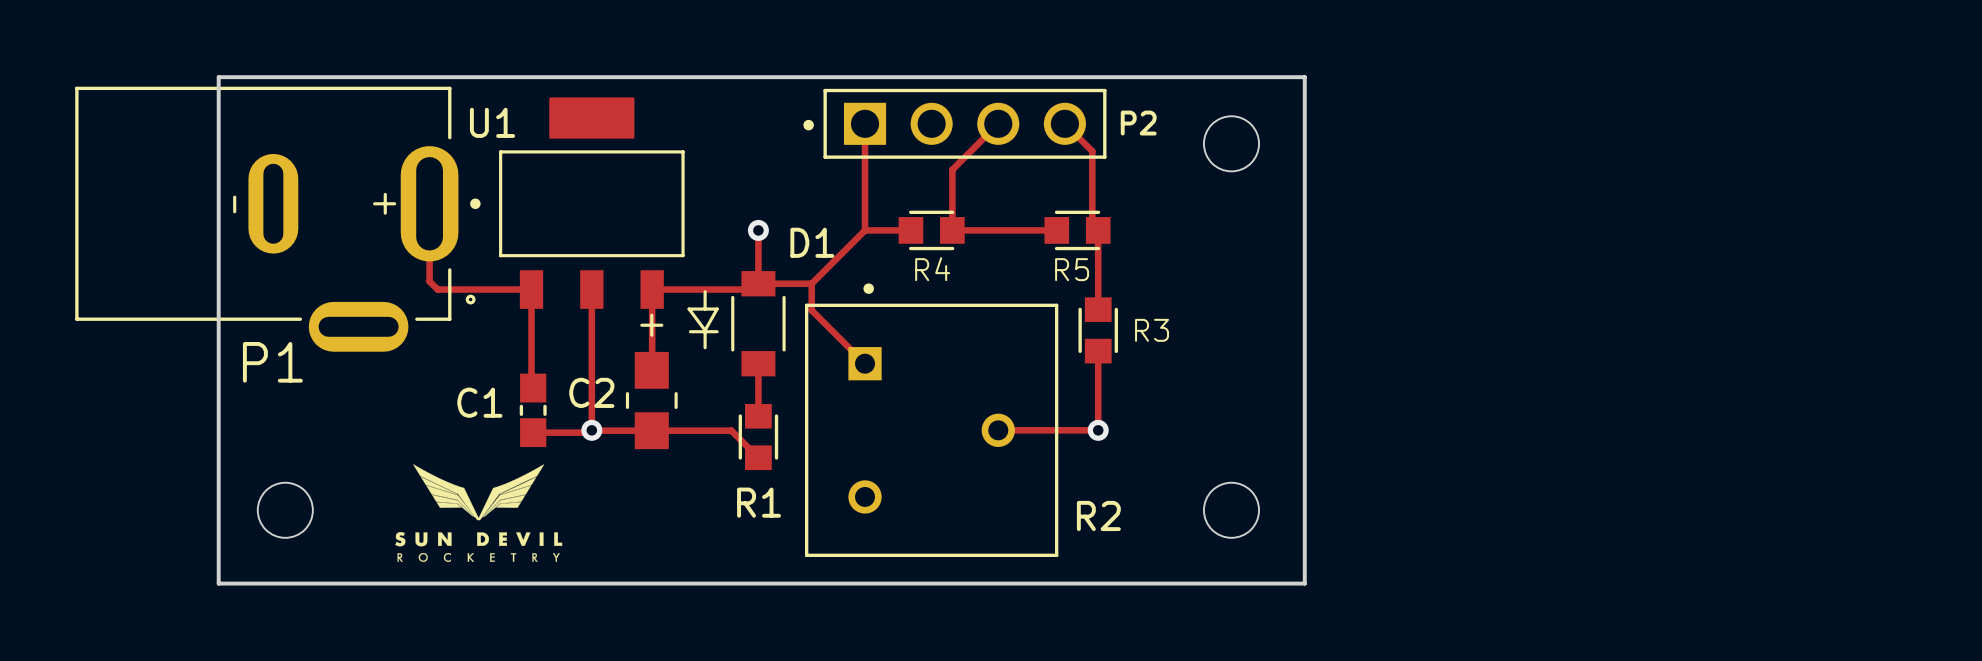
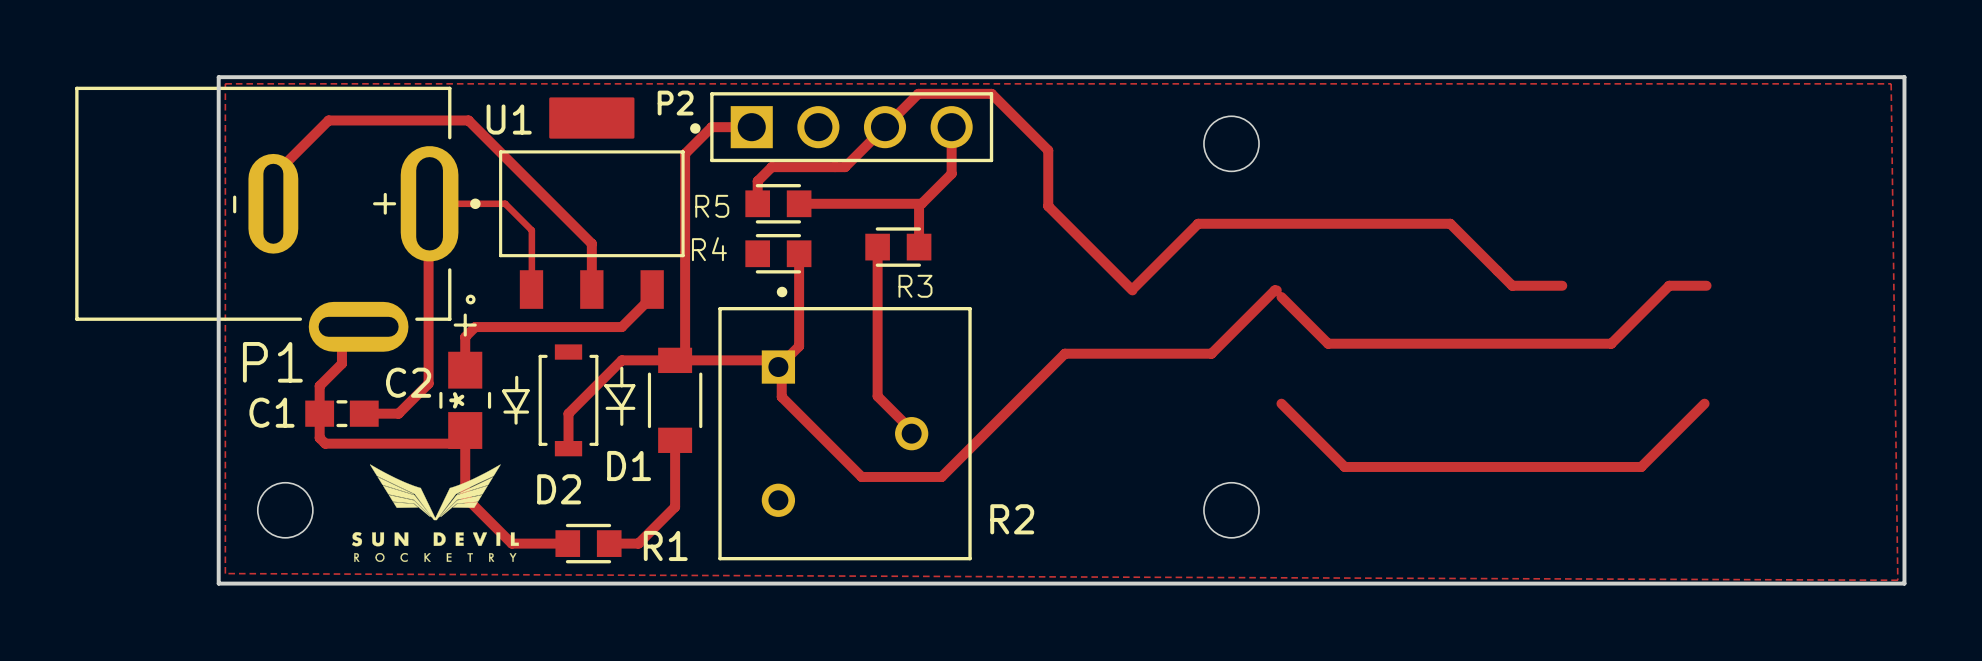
board edge: (1304, 77) (1304, 583) -> (1304, 77) (1904, 77) (1904, 583) (1304, 583)
zone outline: none -> (225, 83) (225, 573) (1897, 580) (1891, 83) (225, 83)
U1 name position: U1 (492, 122) -> U1 (509, 119)
track: (865, 123) (865, 230) -> none
P2 position: (954, 123) -> (841, 127)
track: (998, 123) (952, 169) (952, 230) (1056, 230) -> none
track: (1064, 123) (1092, 151) (1092, 230) -> none
P2 name position: P2 (1138, 123) -> P2 (675, 103)
track: none -> (755, 127) (711, 127) (685, 153) (685, 357)
track: none -> (951, 127) (951, 173) (921, 203) (799, 203)
track: none -> (445, 203) (505, 203) (531, 230) (531, 290)
track: none -> (757, 203) (757, 181) (771, 167) (845, 167) (918, 93) (991, 93) (1048, 150) (1048, 206) (1132, 290)
track: none -> (919, 206) (919, 247)
track: none -> (428, 220) (428, 383) (398, 413) (364, 413)
track: (429, 221) (429, 281) (437, 289) (531, 289) (531, 386) (533, 388) -> none
track: (758, 230) (758, 283) -> none
via: (758, 230) -> none
track: (865, 230) (811, 283) -> none
track: (865, 230) (910, 230) -> none
R4 position: (931, 230) -> (778, 253)
R5 position: (1077, 230) -> (778, 203)
track: (1098, 230) (1098, 309) -> none
D1 name position: D1 (812, 242) -> D1 (629, 465)
track: none -> (877, 247) (877, 396) (911, 430)
track: none -> (799, 253) (799, 346) (781, 363)
R4 name position: R4 (932, 269) -> R4 (709, 249)
R5 name position: R5 (1072, 269) -> R5 (712, 206)
track: (758, 283) (811, 283) -> none
track: (758, 283) (752, 289) (652, 289) (652, 369) -> none
track: (811, 283) (811, 310) (865, 363) -> none
track: none -> (1562, 285) (1512, 285) (1450, 223) (1198, 223) (1134, 287)
track: none -> (1706, 285) (1669, 285) (1611, 343) (1328, 343) (1281, 297)
track: (591, 289) (591, 430) (589, 432) (533, 432) -> (591, 289) (591, 243) (468, 120) (328, 120) (272, 177)
track: none -> (1276, 290) (1211, 353) (1064, 353) (941, 476) (861, 476) (781, 397) (781, 373)
track: none -> (648, 300) (621, 327) (475, 327) (465, 337) (465, 370)
D1 position: (736, 323) -> (653, 400)
track: none -> (341, 330) (341, 363) (319, 385) (319, 438) (325, 443) (461, 443)
R3 rotation: 0° (1098, 330) -> 90° clockwise (898, 247)
R3 position: (1098, 330) -> (898, 247)
track: (1098, 351) (1098, 430) (998, 430) -> none
track: none -> (671, 360) (621, 360) (568, 413) (568, 448)
track: none -> (675, 360) (768, 360) (771, 363)
track: (758, 363) (758, 416) -> none
C2 position: (651, 381) -> (465, 381)
C2 name position: C2 (591, 392) -> C2 (408, 382)
C2 text: none -> * (456, 400)
D2: none -> (550, 400)
track: none -> (1281, 403) (1344, 466) (1641, 466) (1704, 403)
C1 rotation: 0° (533, 410) -> 90° clockwise (341, 413)
C1 position: (533, 410) -> (341, 413)
R2 position: (931, 420) -> (845, 423)
via: (591, 430) -> none
track: (592, 430) (731, 430) (758, 457) -> none
via: (1098, 430) -> none
track: none -> (465, 433) (465, 496) (511, 543) (567, 543)
R1 rotation: 0° (758, 436) -> 90° clockwise (588, 543)
R1 position: (758, 436) -> (588, 543)
track: none -> (675, 440) (675, 506) (638, 543) (608, 543)
R1 name position: R1 (759, 502) -> R1 (665, 545)
drawing position: (478, 513) -> (435, 513)

